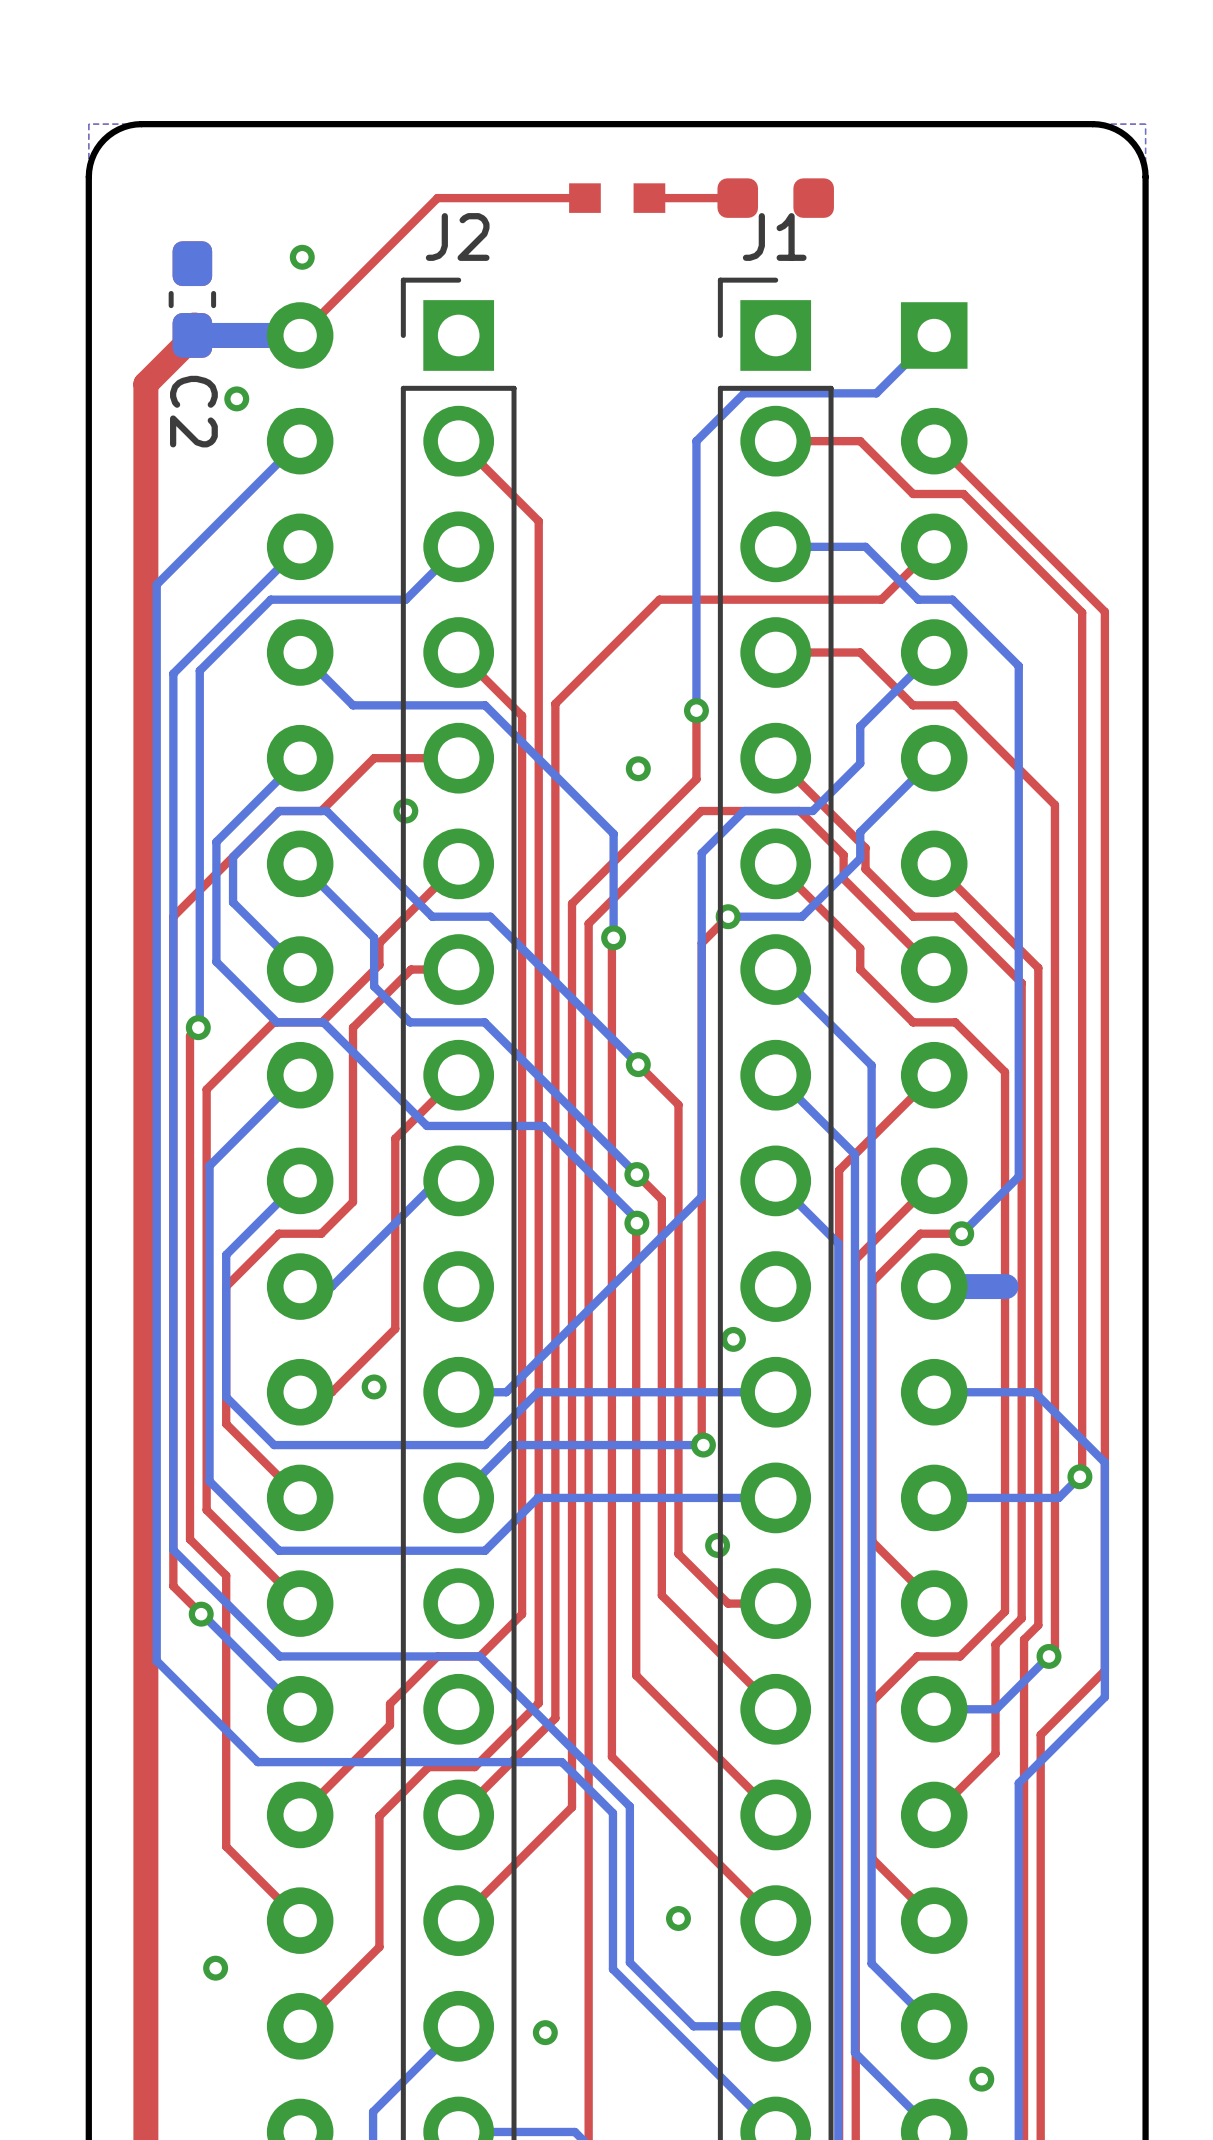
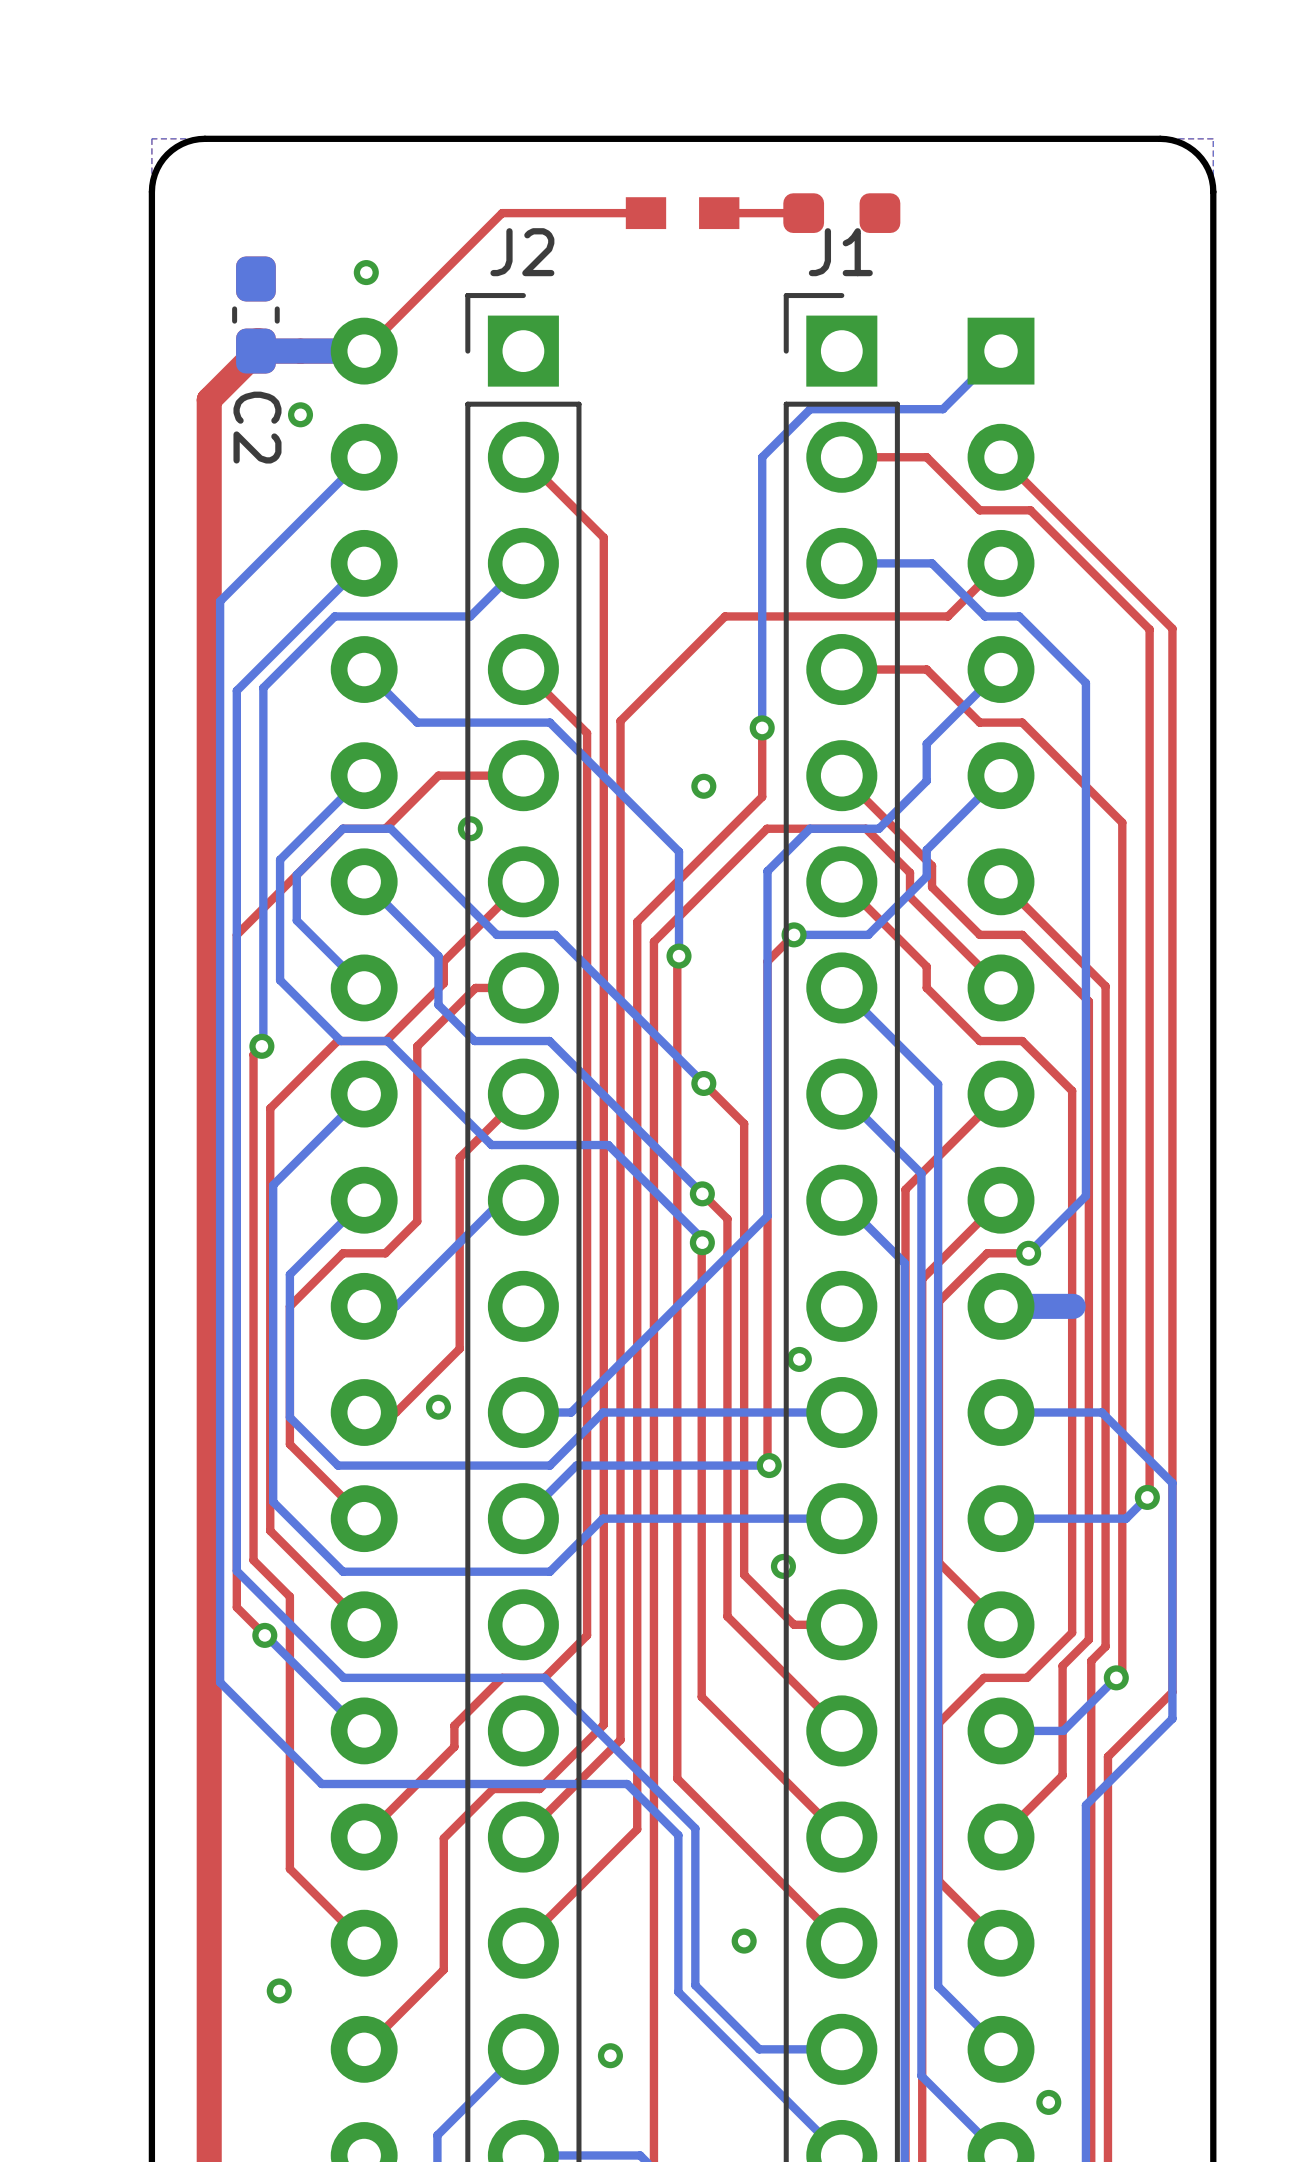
part footprint: [569, 183, 666, 213] -> [625, 197, 740, 230]

